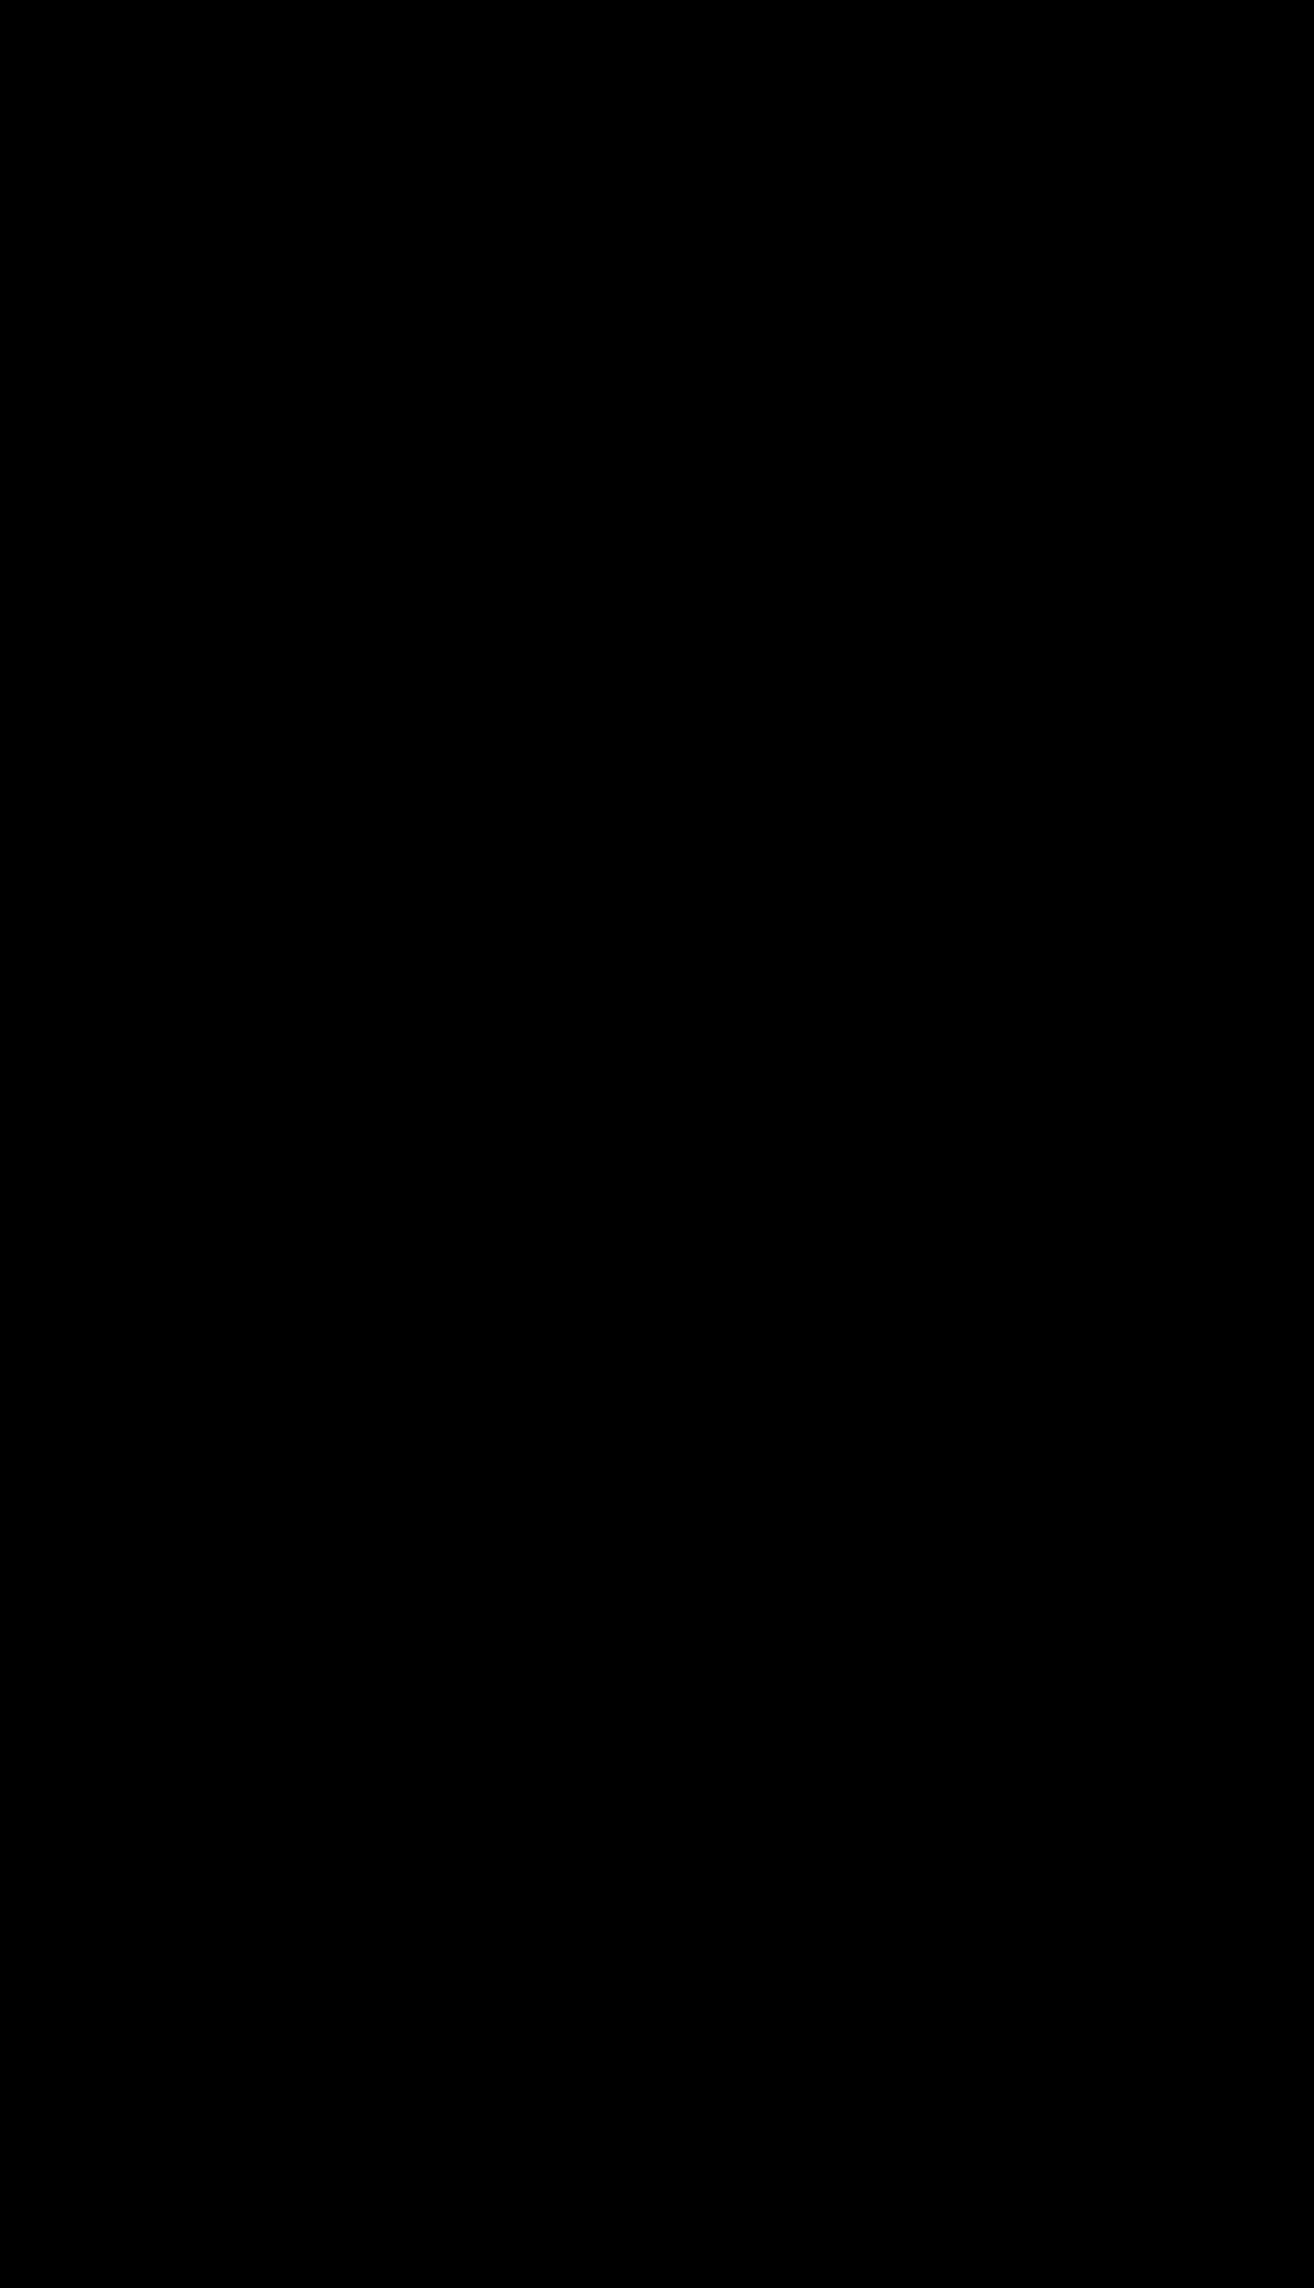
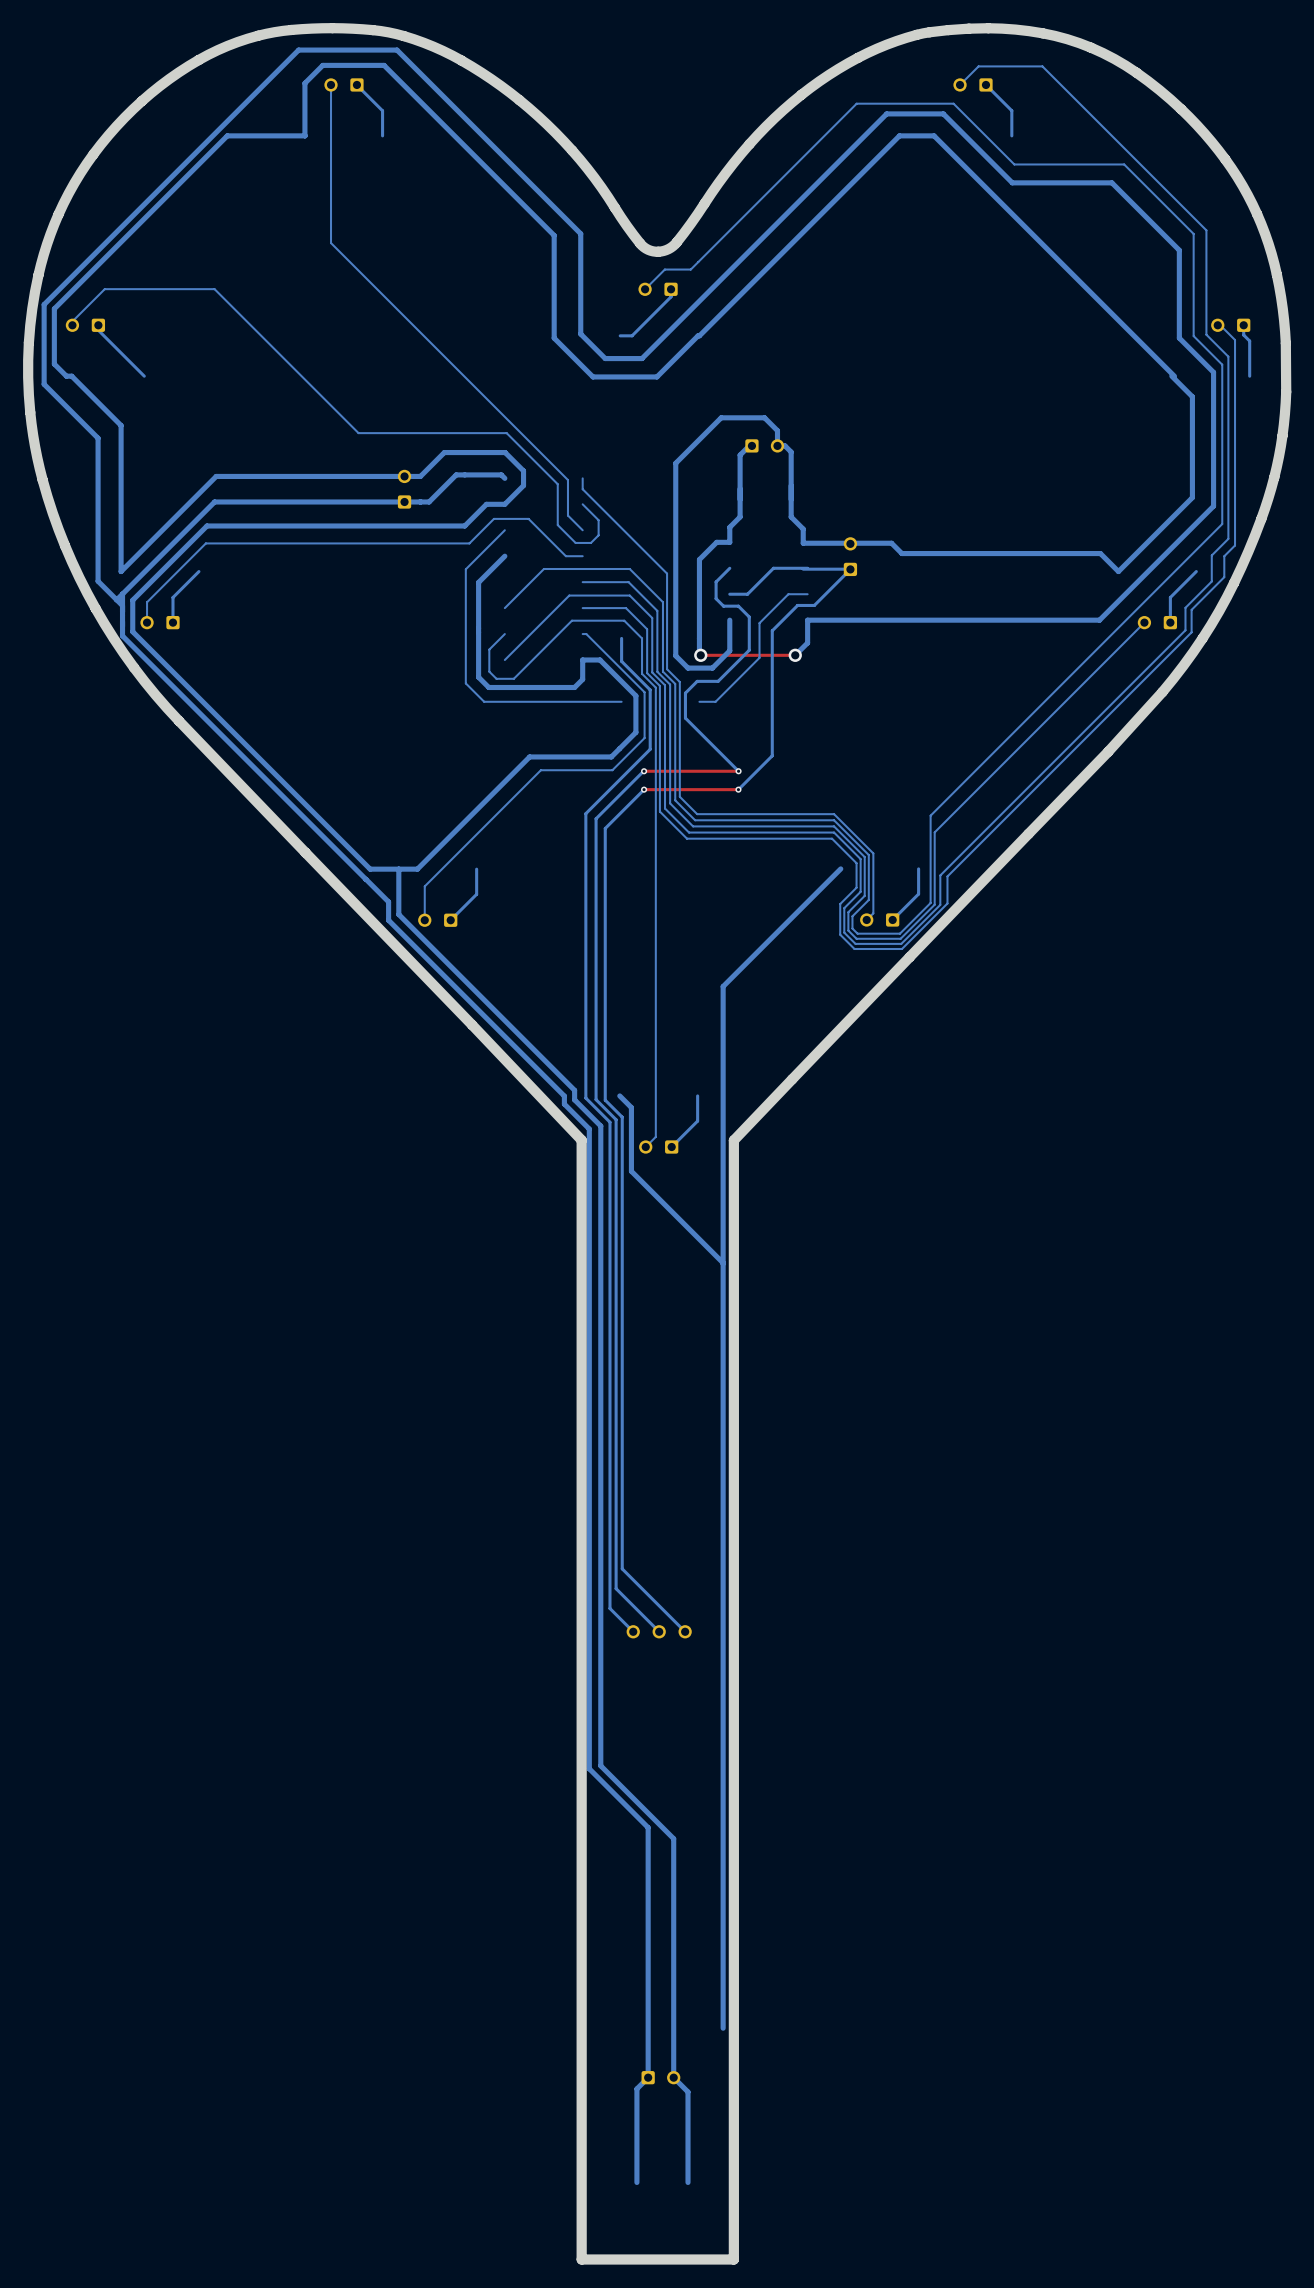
board edge: none -> (332, 28) (380, 31) (413, 39) (452, 55) (491, 79) (528, 107) (555, 132) (594, 178) (640, 243) (648, 249) (658, 251) (668, 249) (676, 242) (733, 163) (774, 118) (810, 87) (857, 57) (906, 37) (948, 30) (988, 28) (1015, 29) (1067, 39) (1102, 53) (1136, 72) (1170, 99) (1204, 133) (1231, 168) (1252, 204) (1268, 243) (1279, 286) (1285, 331) (1286, 391) (1283, 424) (1276, 467) (1264, 508) (1248, 551) (1226, 597) (1202, 638) (1162, 692) (1108, 751) (733, 1140) (733, 2259) (581, 2259) (581, 1140) (178, 720) (144, 681) (104, 623) (71, 561) (47, 496) (35, 446) (28, 377) (28, 342) (35, 291) (43, 254) (54, 224) (68, 193) (86, 163) (116, 126) (142, 101) (169, 79) (198, 60) (227, 45) (266, 33) (291, 29) (332, 28)
bottom track: none -> (331, 84) (331, 243) (567, 480) (567, 515) (582, 530)
part: none -> (343, 84)
bottom track: none -> (356, 84) (382, 110) (382, 135)
bottom track: none -> (960, 84) (978, 66) (1042, 66) (1206, 230) (1206, 334) (1228, 356) (1228, 538) (1211, 555) (1211, 581) (1185, 607) (1185, 630) (940, 875) (940, 904) (901, 943) (855, 943) (844, 932) (844, 908) (860, 891) (860, 859) (834, 832) (689, 832) (665, 808) (665, 685) (652, 672) (652, 618) (629, 595) (569, 595) (504, 660)
part: none -> (973, 84)
bottom track: none -> (985, 84) (1011, 110) (1011, 135)
bottom track: none -> (304, 135) (304, 83) (322, 65) (384, 65) (554, 235) (554, 338) (593, 376) (656, 376) (899, 135) (934, 135) (1174, 376)
bottom track: none -> (305, 135) (227, 135) (54, 308) (54, 364) (66, 376) (71, 376) (121, 425) (121, 571) (216, 476) (420, 476) (444, 452) (505, 452) (523, 470) (523, 485) (504, 504) (486, 504) (464, 525) (206, 525) (132, 600) (132, 631) (370, 869) (417, 869) (529, 756) (611, 756) (635, 732) (635, 695) (600, 660) (582, 660) (582, 679) (574, 687) (488, 687) (478, 677) (478, 582) (504, 556)
bottom track: none -> (645, 289) (664, 269) (690, 269) (856, 103) (953, 103) (1014, 164) (1124, 164) (1193, 233) (1193, 336) (1222, 364) (1222, 524) (930, 815) (930, 903) (899, 933) (857, 933) (852, 928) (852, 916) (868, 899) (868, 855) (834, 820) (695, 820) (675, 800) (675, 683) (662, 671) (662, 602) (629, 568) (543, 568) (504, 608)
part: none -> (658, 289)
bottom track: none -> (671, 289) (671, 296) (632, 335) (620, 335)
bottom track: none -> (68, 325) (104, 289) (214, 289) (358, 433) (506, 433) (557, 484) (557, 525) (575, 542) (590, 542) (598, 535) (598, 520) (582, 504)
part: none -> (85, 325)
bottom track: none -> (94, 325) (144, 376)
bottom track: none -> (1220, 325) (1235, 339) (1235, 545) (1224, 556) (1224, 577) (1191, 609) (1191, 632) (947, 876) (947, 903) (901, 949) (854, 949) (840, 934) (840, 904) (856, 887) (856, 863) (832, 838) (686, 838) (659, 811) (659, 685) (647, 673) (647, 629) (625, 608) (582, 608)
part: none -> (1230, 325)
bottom track: none -> (1243, 325) (1243, 335) (1249, 341) (1249, 376)
bottom track: none -> (1171, 376) (1192, 396) (1192, 497) (1118, 571) (1100, 553) (901, 553) (891, 543) (803, 543) (803, 529) (791, 517) (791, 452) (785, 445) (777, 445) (777, 430) (764, 417) (721, 417) (675, 463) (675, 655) (688, 668) (712, 668) (729, 650) (729, 620)
bottom track: none -> (751, 445) (749, 445) (740, 455) (740, 517) (729, 527) (729, 542) (716, 542) (699, 559) (700, 655)
part: none -> (764, 445)
bottom track: none -> (504, 478) (501, 474) (456, 474) (429, 501) (214, 501) (116, 599)
bottom track: none -> (582, 478) (582, 489) (667, 573) (667, 669) (679, 682) (679, 796) (697, 814) (834, 814) (873, 853) (873, 913) (866, 919)
part: none -> (404, 489)
bottom track: none -> (504, 530) (465, 569) (465, 683) (484, 701) (621, 701)
bottom track: none -> (582, 556) (565, 556) (528, 518) (493, 518) (469, 543) (205, 543) (147, 602) (147, 622)
part: none -> (850, 556)
bottom track: none -> (729, 568) (716, 581) (716, 598) (723, 606) (738, 606) (749, 617) (749, 650) (718, 681) (697, 681) (685, 693) (685, 718) (738, 771)
bottom track: none -> (807, 568) (773, 568) (747, 594) (729, 594)
bottom track: none -> (850, 569) (814, 605) (797, 605) (772, 630) (772, 755) (738, 789)
bottom track: none -> (852, 569) (803, 569)
bottom track: none -> (198, 571) (172, 597) (172, 622)
bottom track: none -> (1196, 571) (1170, 597) (1170, 622)
bottom track: none -> (582, 582) (628, 582) (657, 610) (657, 671) (670, 684) (670, 803) (693, 826) (834, 826) (864, 857) (864, 895) (848, 912) (848, 930) (856, 938) (900, 938) (934, 904) (934, 832) (1144, 622)
bottom track: none -> (122, 594) (122, 635) (365, 879)
bottom track: none -> (807, 594) (788, 594) (759, 623) (759, 657) (715, 701) (699, 701)
bottom track: none -> (122, 605) (98, 581) (98, 438) (44, 384) (44, 304) (298, 50) (397, 50) (580, 233) (580, 334) (605, 358) (642, 358) (886, 113) (943, 113) (1012, 182) (1111, 182) (1179, 250) (1179, 338) (1213, 372) (1213, 506) (1099, 620) (807, 620) (807, 642) (795, 655)
part: none -> (160, 622)
part: none -> (1157, 622)
bottom track: none -> (504, 634) (489, 649) (489, 671) (496, 678) (513, 678) (571, 620) (624, 620) (642, 638) (642, 673) (655, 687) (655, 1136) (645, 1147)
bottom track: none -> (582, 634) (586, 634) (644, 692) (644, 738) (612, 770) (540, 770) (424, 886) (424, 920)
bottom track: none -> (621, 638) (621, 661) (650, 689) (650, 749) (585, 813) (585, 1098) (609, 1122) (609, 1608) (633, 1631)
via: none -> (700, 655)
top track: none -> (795, 655) (700, 655)
via: none -> (795, 655)
bottom track: none -> (644, 771) (596, 818) (596, 1099) (616, 1119) (616, 1588) (659, 1631)
via: none -> (644, 771)
top track: none -> (738, 771) (644, 771)
via: none -> (738, 771)
bottom track: none -> (644, 789) (605, 828) (605, 1100) (622, 1117) (622, 1568) (685, 1631)
via: none -> (644, 789)
top track: none -> (738, 789) (643, 789)
via: none -> (738, 789)
bottom track: none -> (840, 868) (723, 986) (723, 2028)
bottom track: none -> (918, 868) (918, 894) (892, 919)
bottom track: none -> (398, 869) (398, 914) (574, 1090) (574, 1099) (600, 1126) (600, 1765) (673, 1838) (673, 2077) (688, 2091) (688, 2182)
bottom track: none -> (476, 869) (476, 894) (450, 920)
bottom track: none -> (366, 879) (388, 901) (388, 920) (564, 1096) (564, 1104) (589, 1129) (589, 1768) (648, 1827) (648, 2077) (636, 2088) (636, 2182)
part: none -> (879, 919)
part: none -> (437, 920)
bottom track: none -> (619, 1095) (631, 1107) (631, 1171) (723, 1263)
bottom track: none -> (697, 1095) (697, 1121) (671, 1147)
part: none -> (658, 1147)
part: none -> (659, 1631)
part: none -> (660, 2077)

